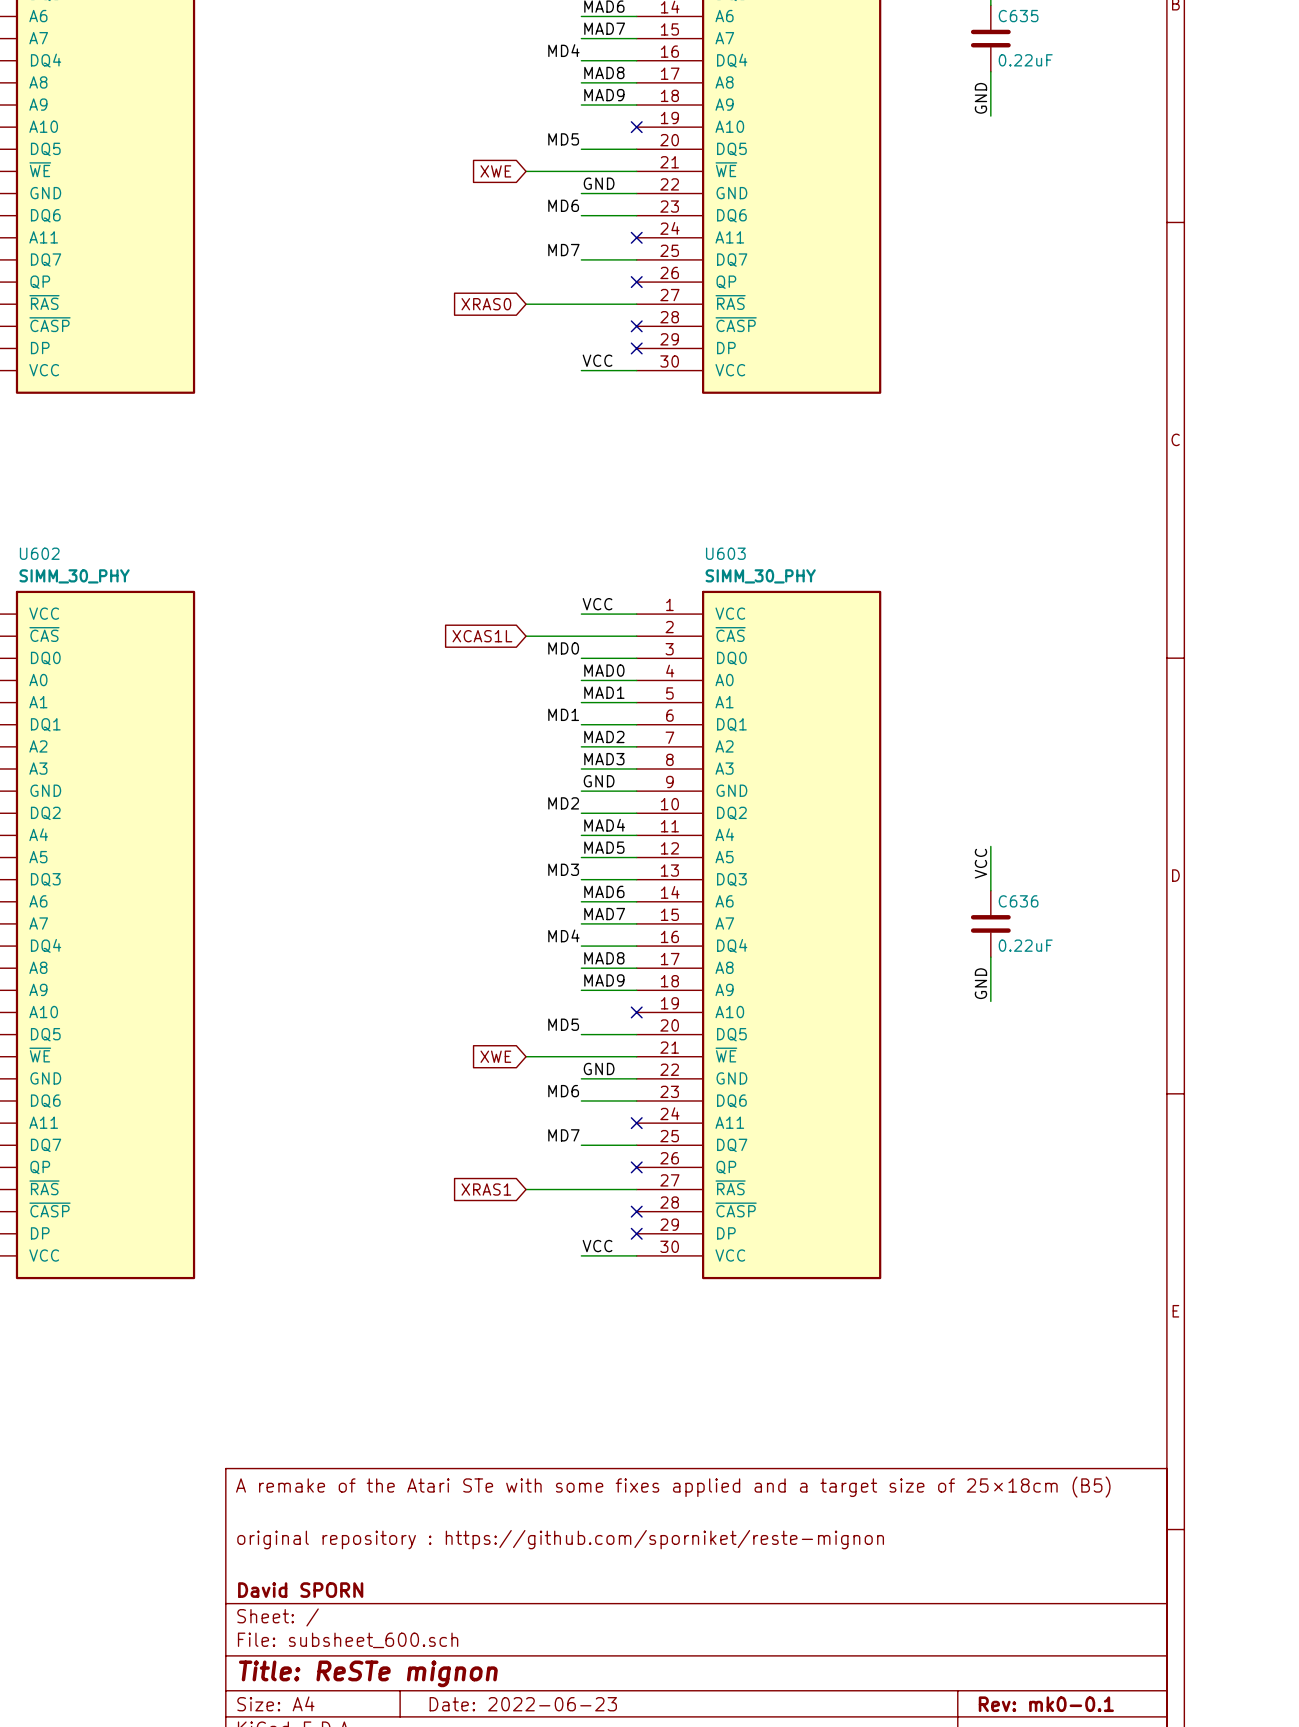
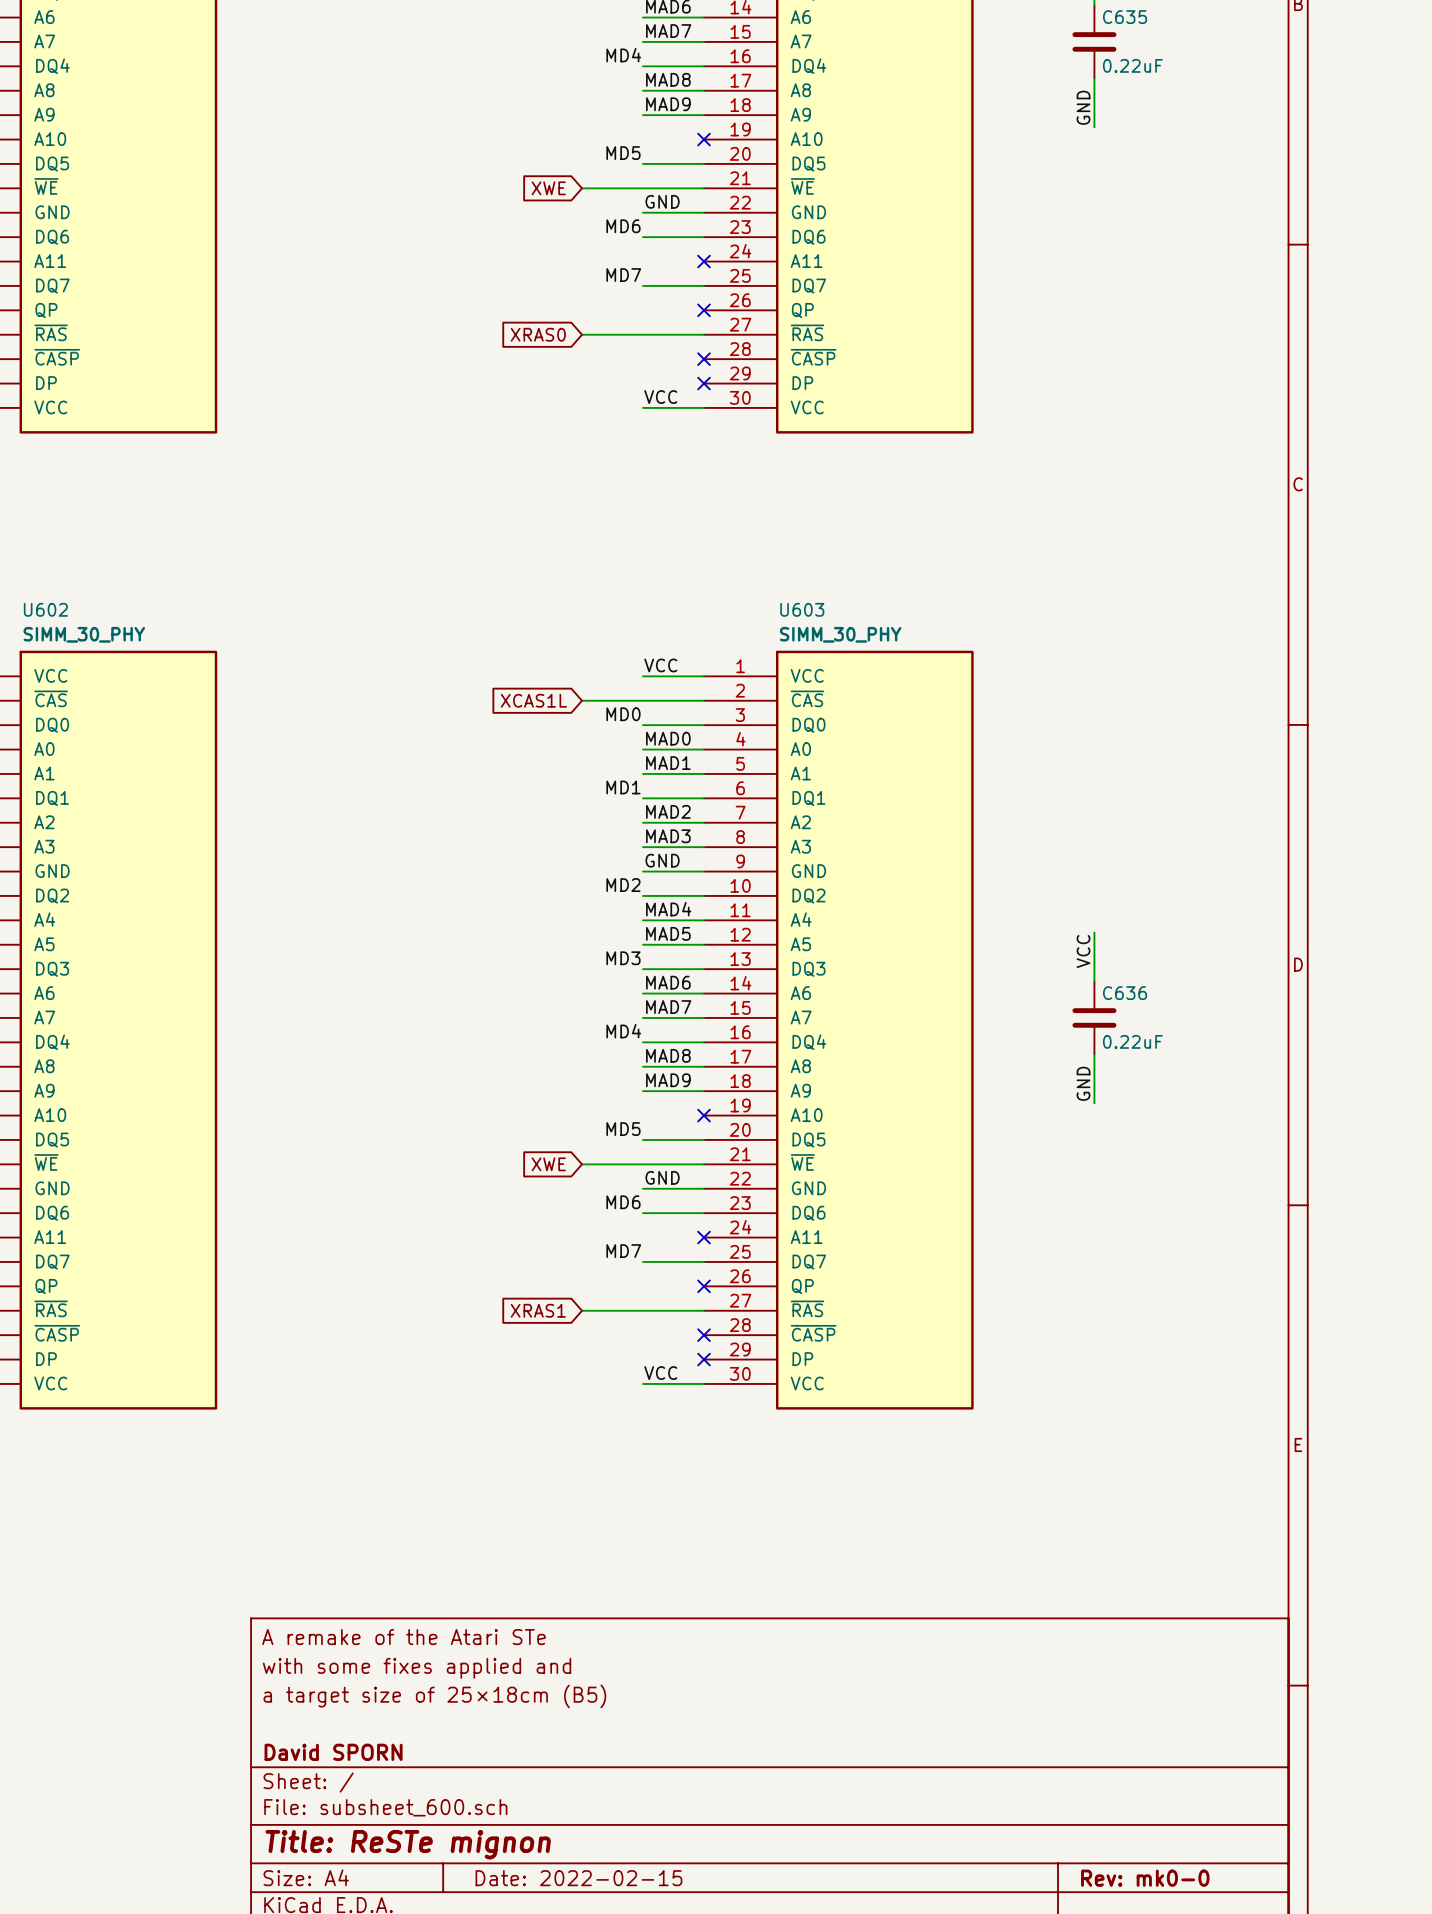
title block: A remake of the Atari STe with some fixes applied and a target size of 25×18cm (B5) (673, 1487) -> A remake of the Atari STe (403, 1637)
title block: none -> with some fixes applied and (417, 1668)
title block: original repository : https://github.com/sporniket/reste-mignon (560, 1539) -> a target size of 25×18cm (B5) (434, 1696)
title block: Date: 2022-06-23 (523, 1704) -> Date: 2022-02-15 (578, 1878)
title block: Rev: mk0-0.1 (1046, 1704) -> Rev: mk0-0 (1145, 1878)

